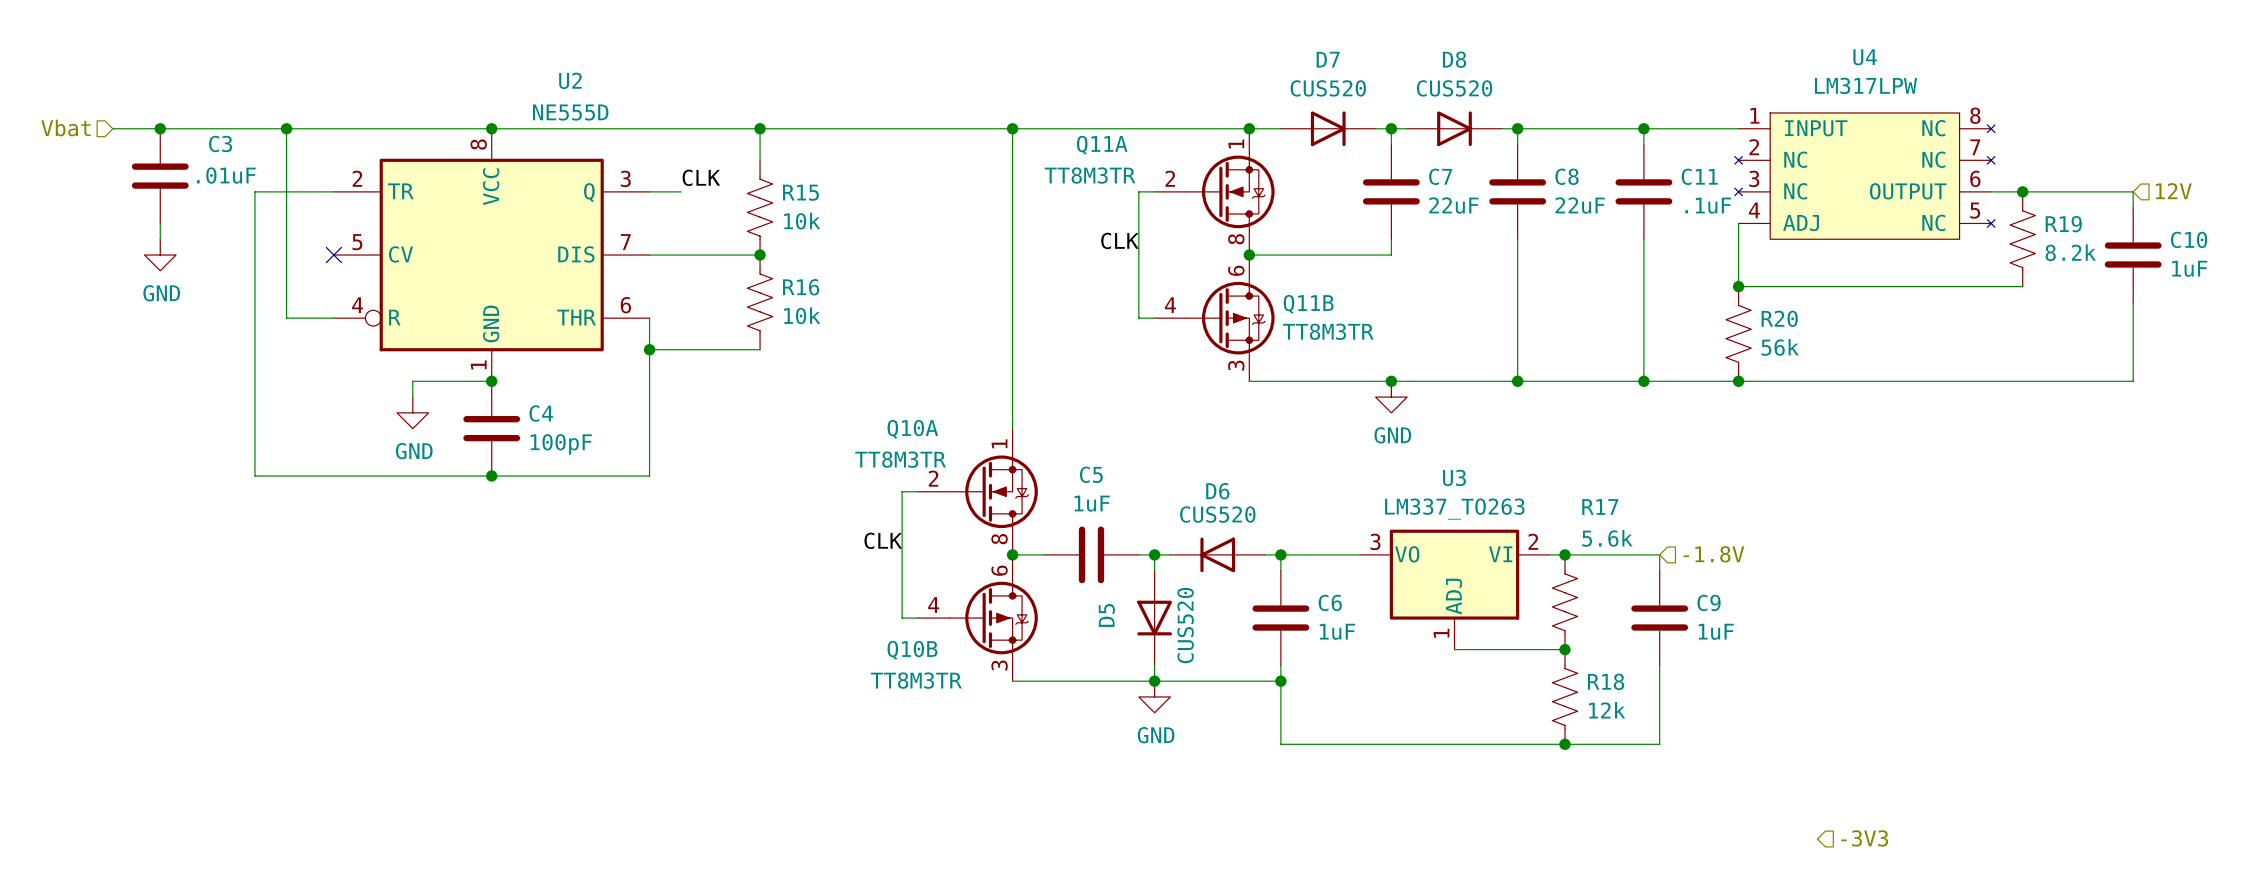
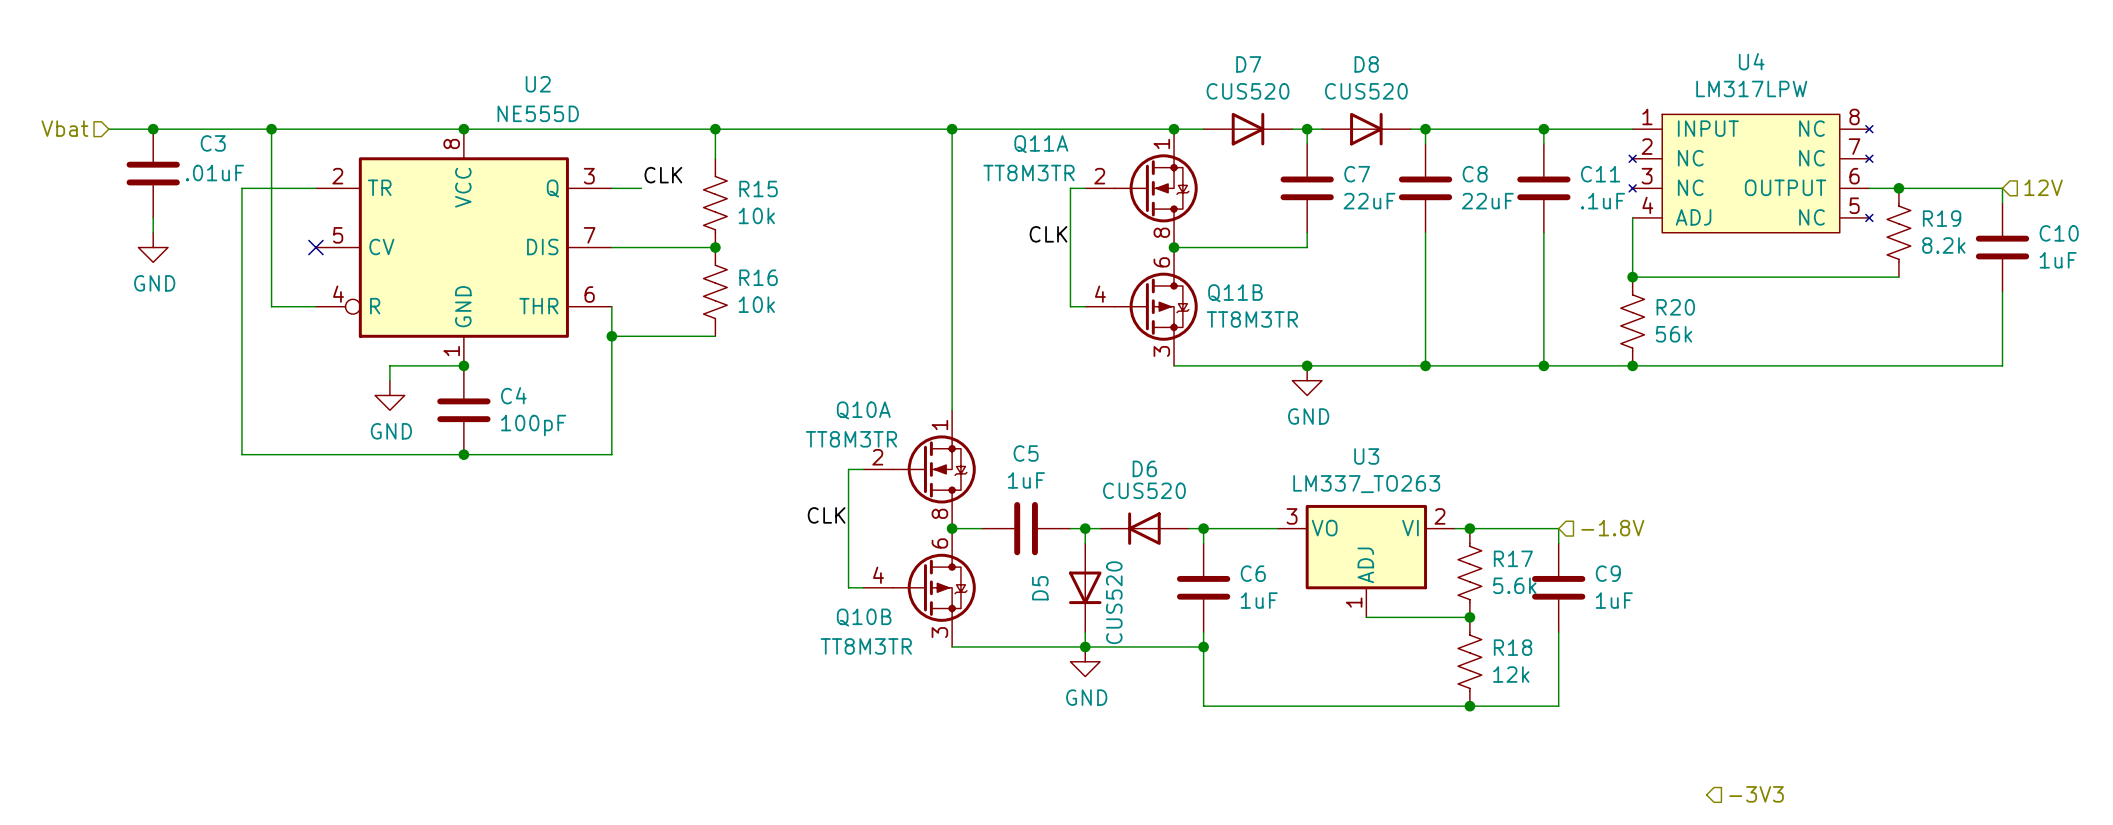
R17 name position: R17 (1600, 506) -> R17 (1513, 558)
R17 value position: 5.6k (1607, 538) -> 5.6k (1514, 585)

